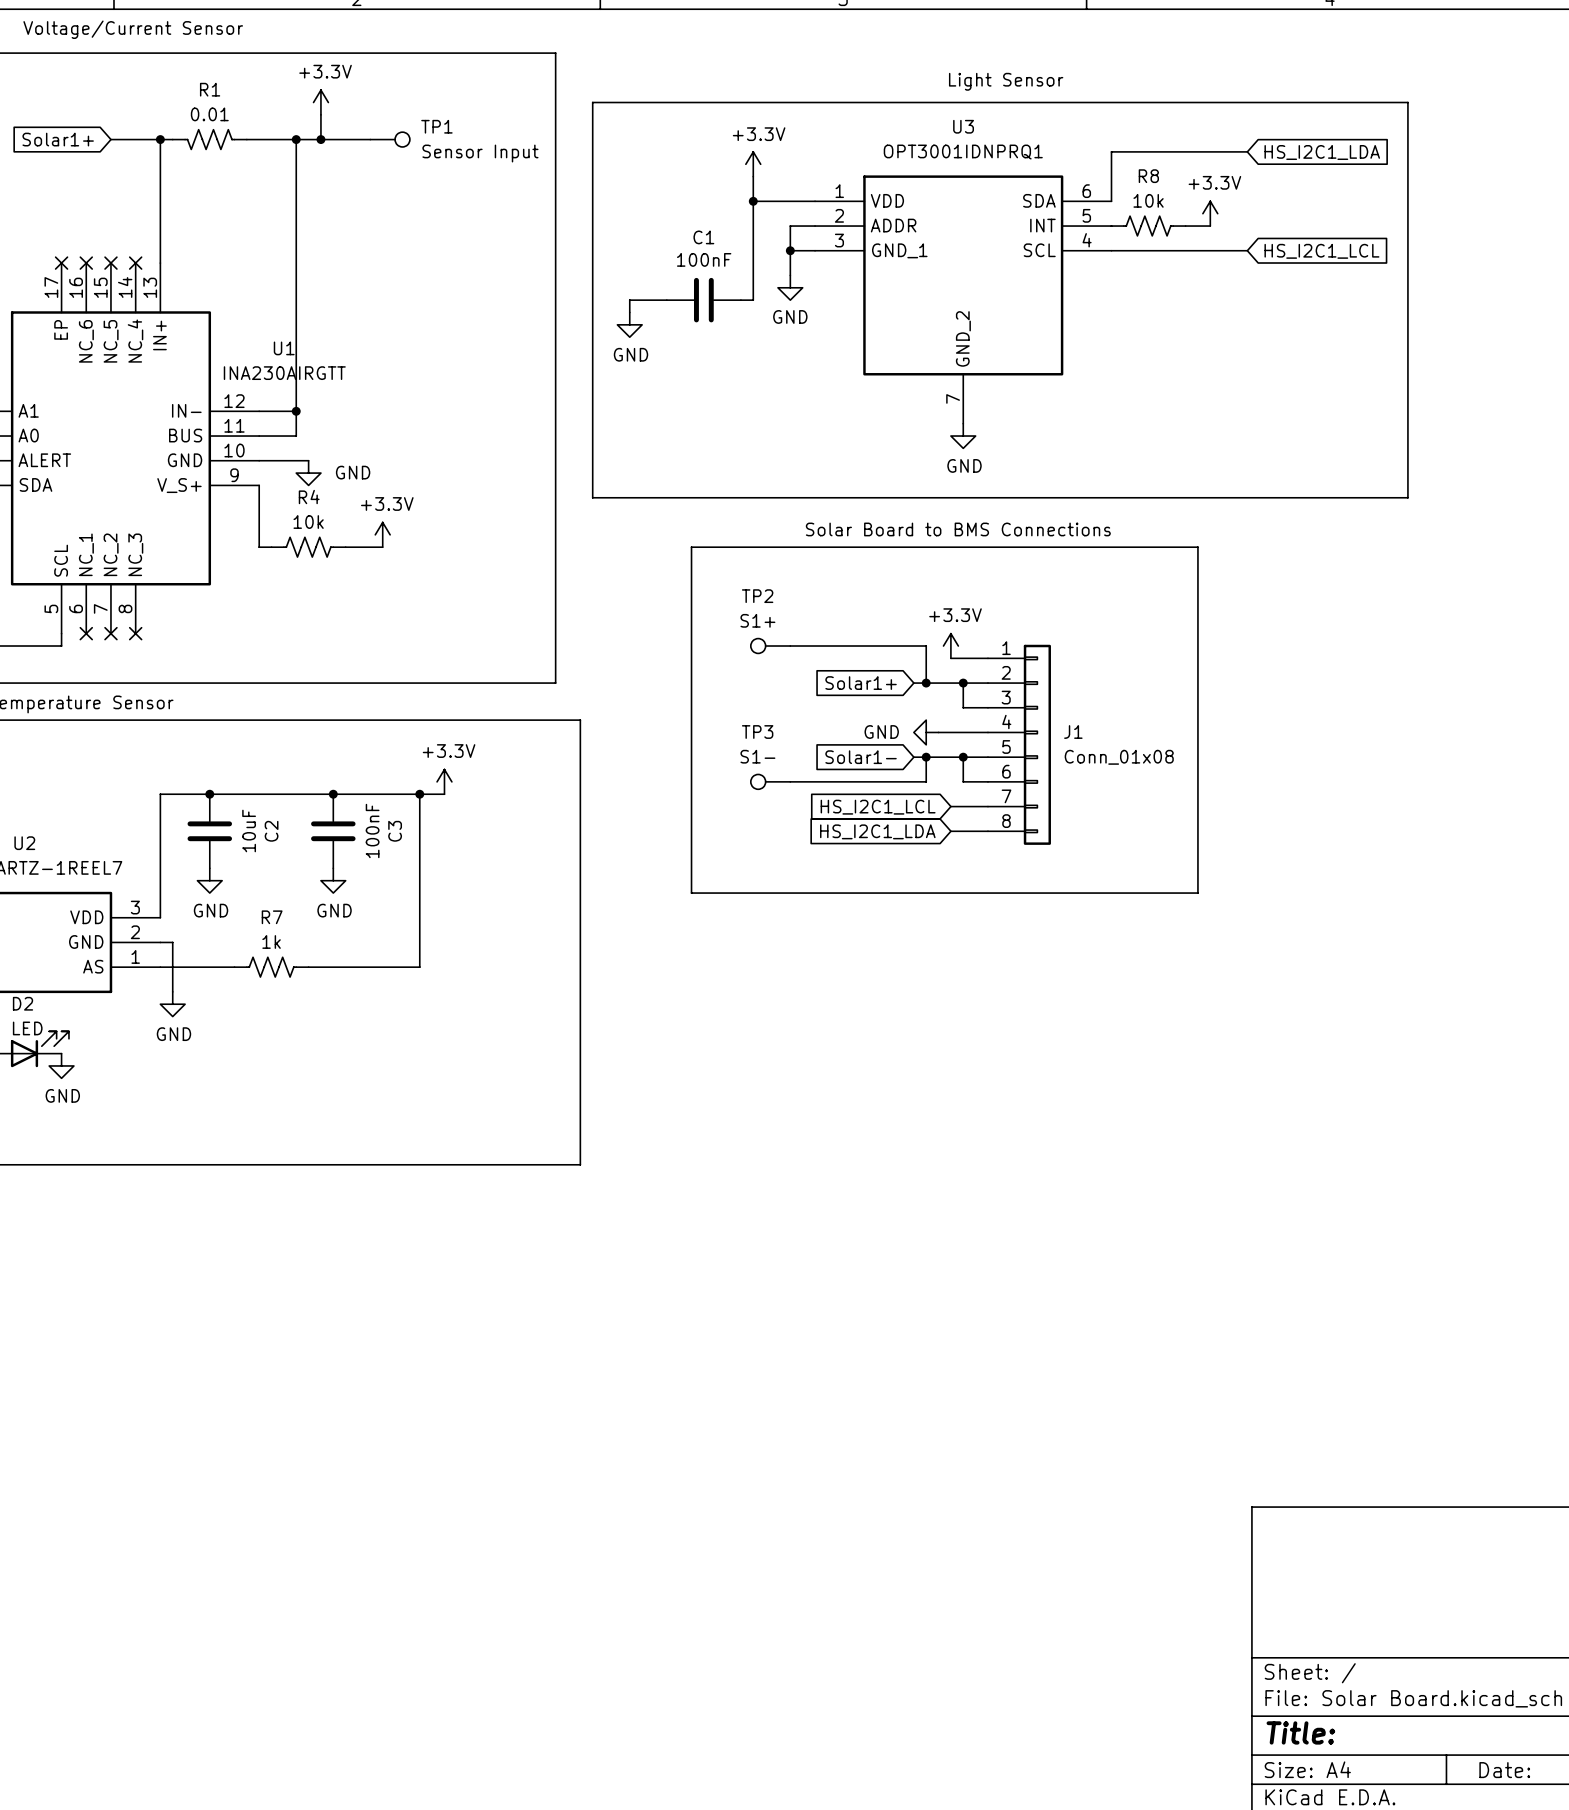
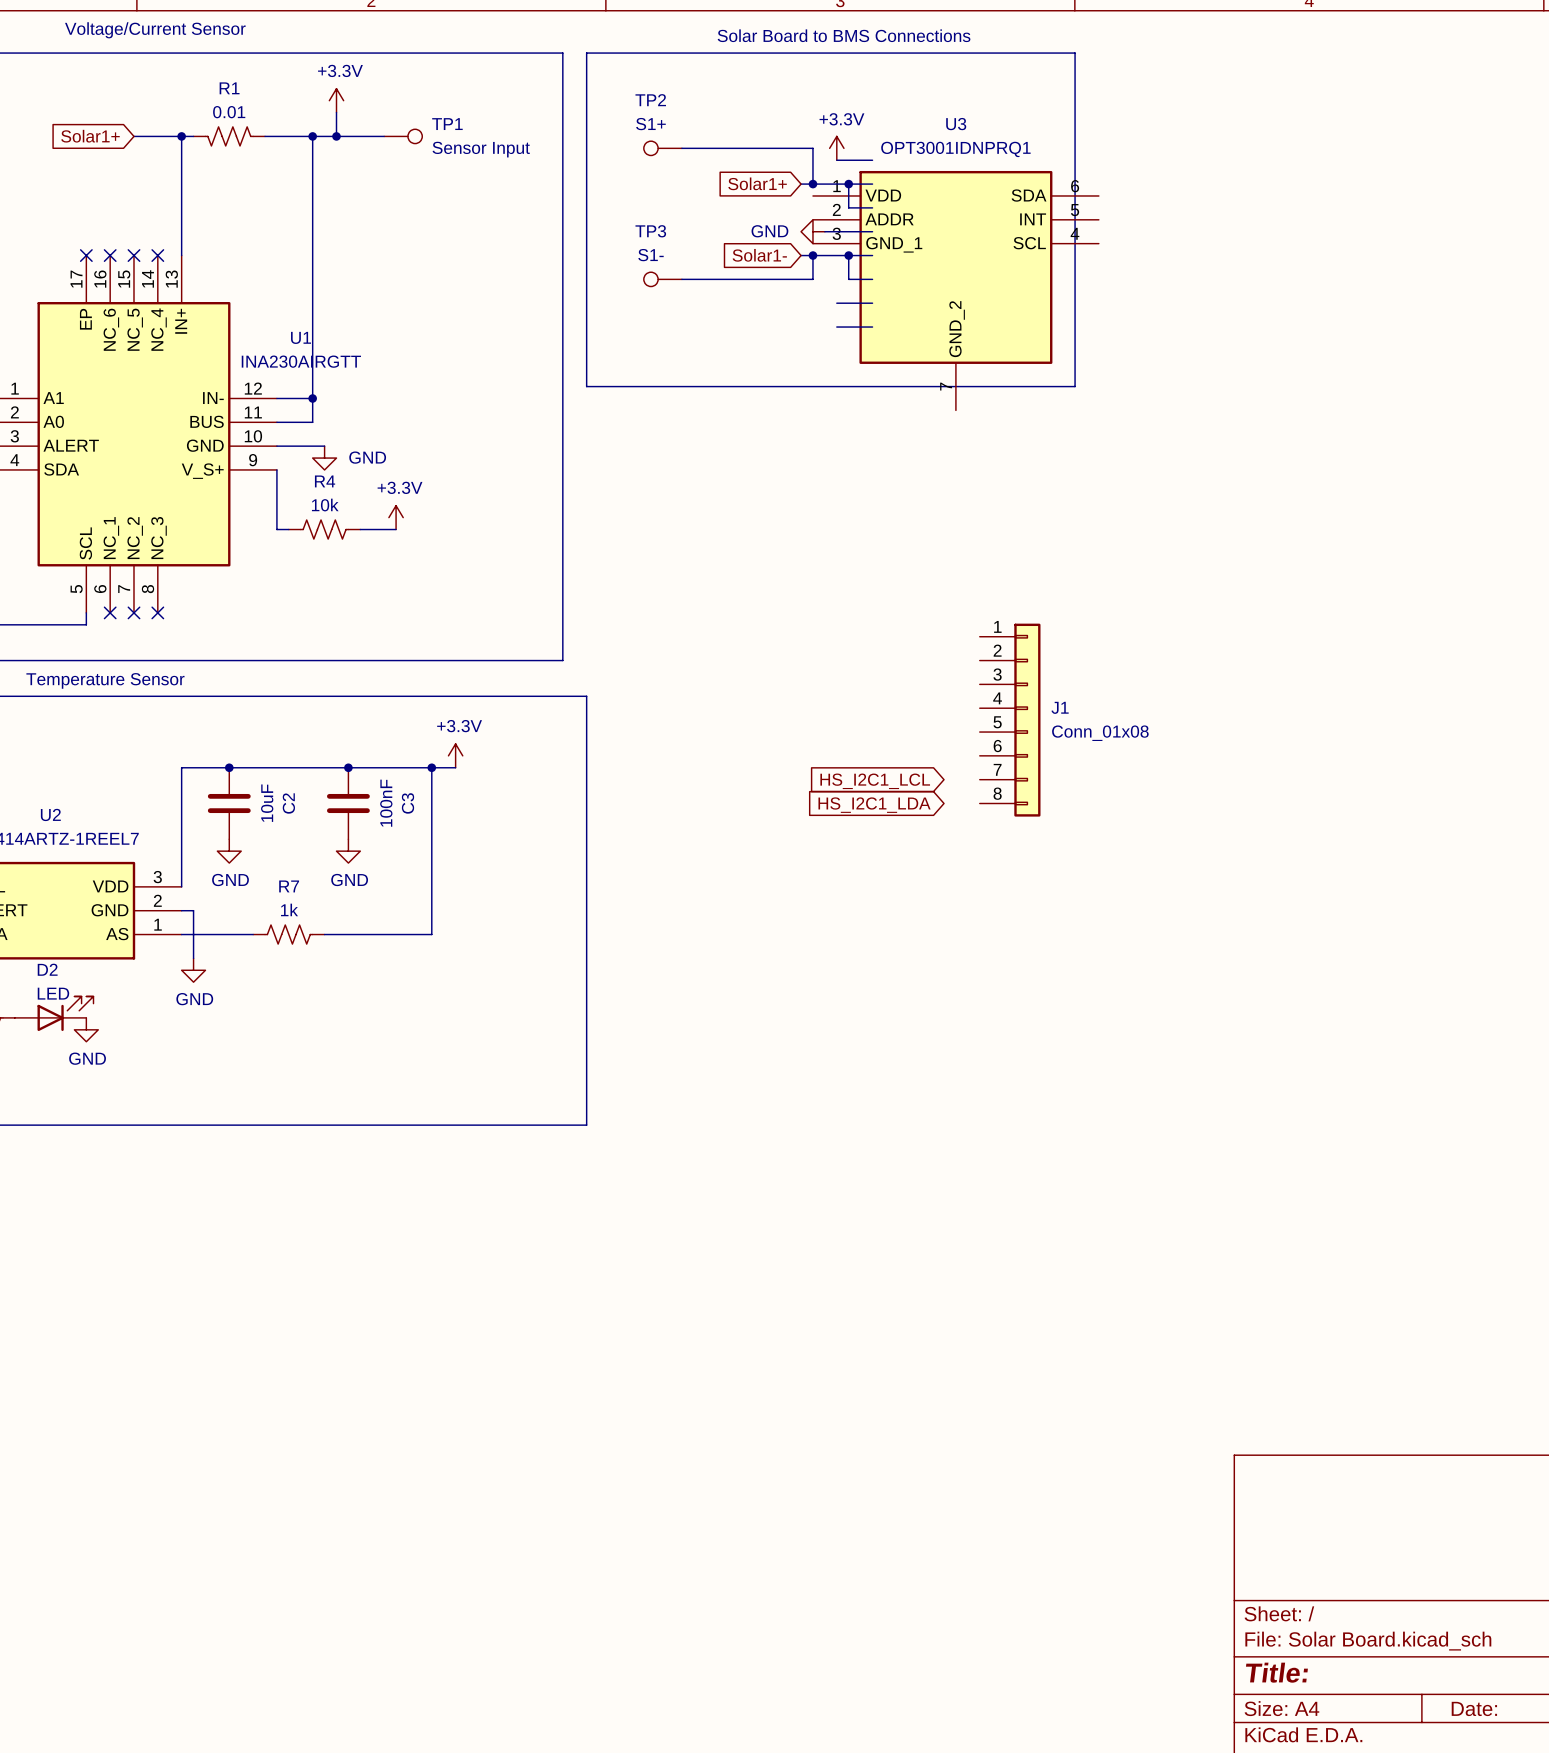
text: none -> Solar Board to BMS Connections (844, 35)
line: none -> (586, 53) (586, 386) (1075, 386) (1075, 53) (586, 53)
text: Light Sensor (1006, 81) -> none
line: (592, 102) (1407, 102) (1407, 497) (592, 497) (592, 102) -> none
wire: none -> (681, 148) (812, 148) (812, 184)
wire: (1247, 151) (1111, 151) (1111, 201) -> none
global label: HS_I2C1_LDA (1322, 152) -> none
power symbol position: +3.3V (753, 164) -> +3.3V (836, 148)
wire: none -> (836, 160) (872, 160)
wire: (753, 176) (753, 300) (740, 300) -> none
global label: none -> Solar1+ (757, 183)
wire: none -> (801, 184) (872, 184)
junction: none -> (812, 184)
wire: none -> (848, 184) (848, 207) (872, 207)
junction: none -> (848, 184)
wire: (753, 201) (815, 201) -> none
junction: (753, 201) -> none
power symbol: +3.3V (1210, 213) -> none
wire: (815, 226) (790, 226) (790, 275) -> none
R8: 10k (1148, 226) -> none
wire: (1185, 226) (1210, 226) -> none
wire: none -> (824, 231) (872, 231)
wire: (790, 250) (815, 250) -> none
junction position: (790, 250) -> (812, 255)
wire: (1111, 250) (1247, 250) -> none
global label: HS_I2C1_LCL (1321, 251) -> none
global label: none -> Solar1- (759, 255)
wire: none -> (801, 255) (872, 255)
wire: none -> (812, 255) (812, 279) (681, 279)
wire: none -> (848, 255) (848, 279) (872, 279)
junction: none -> (848, 255)
power symbol rotation: 0° (790, 287) -> 90° clockwise (812, 231)
power symbol position: GND (790, 287) -> GND (812, 231)
wire: (666, 300) (629, 300) (629, 312) -> none
C1: 100nF (703, 300) -> none
wire: none -> (836, 303) (872, 303)
power symbol: GND (629, 324) -> none
wire: none -> (836, 327) (872, 327)
power symbol: GND (963, 436) -> none
text: Solar Board to BMS Connections (958, 529) -> none
line: (691, 547) (1197, 547) (1197, 893) (691, 893) (691, 547) -> none
TP2 position: (770, 646) -> (662, 148)
wire: (790, 646) (926, 646) (926, 683) -> none
power symbol: +3.3V (950, 646) -> none
wire: (950, 658) (987, 658) -> none
global label: Solar1+ (861, 683) -> none
wire: (913, 683) (987, 683) -> none
junction: (926, 683) -> none
wire: (963, 683) (963, 707) (987, 707) -> none
junction: (963, 683) -> none
power symbol: GND (926, 732) -> none
wire: (938, 732) (987, 732) -> none
global label: Solar1- (861, 757) -> none
wire: (913, 757) (987, 757) -> none
wire: (926, 757) (926, 781) (790, 781) -> none
junction: (926, 757) -> none
wire: (963, 757) (963, 781) (987, 781) -> none
junction: (963, 757) -> none
TP3 position: (770, 781) -> (662, 279)
wire: (950, 806) (987, 806) -> none
wire: (950, 831) (987, 831) -> none

